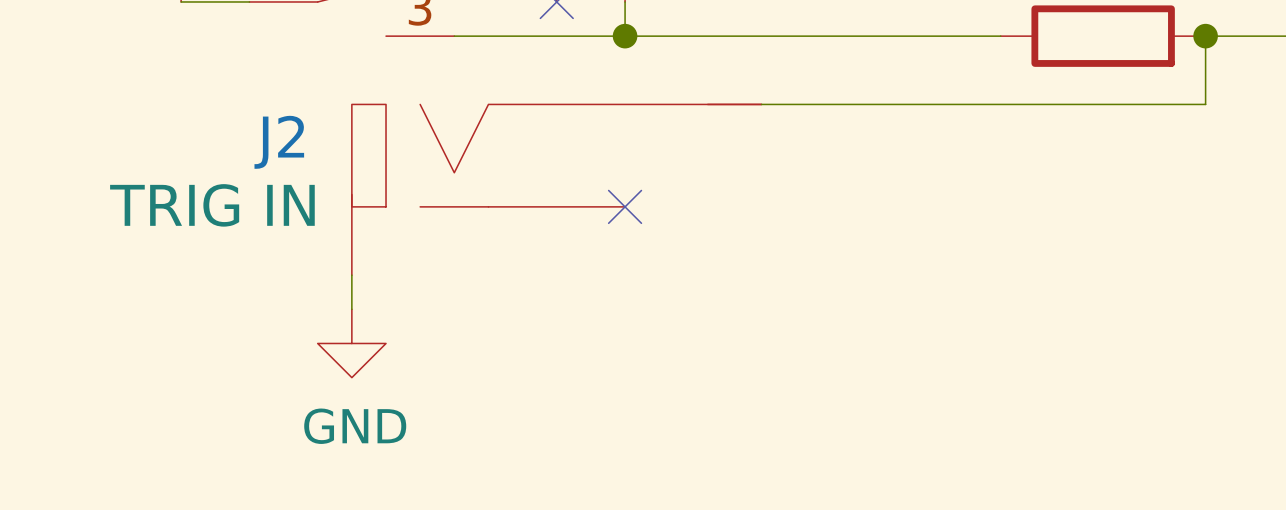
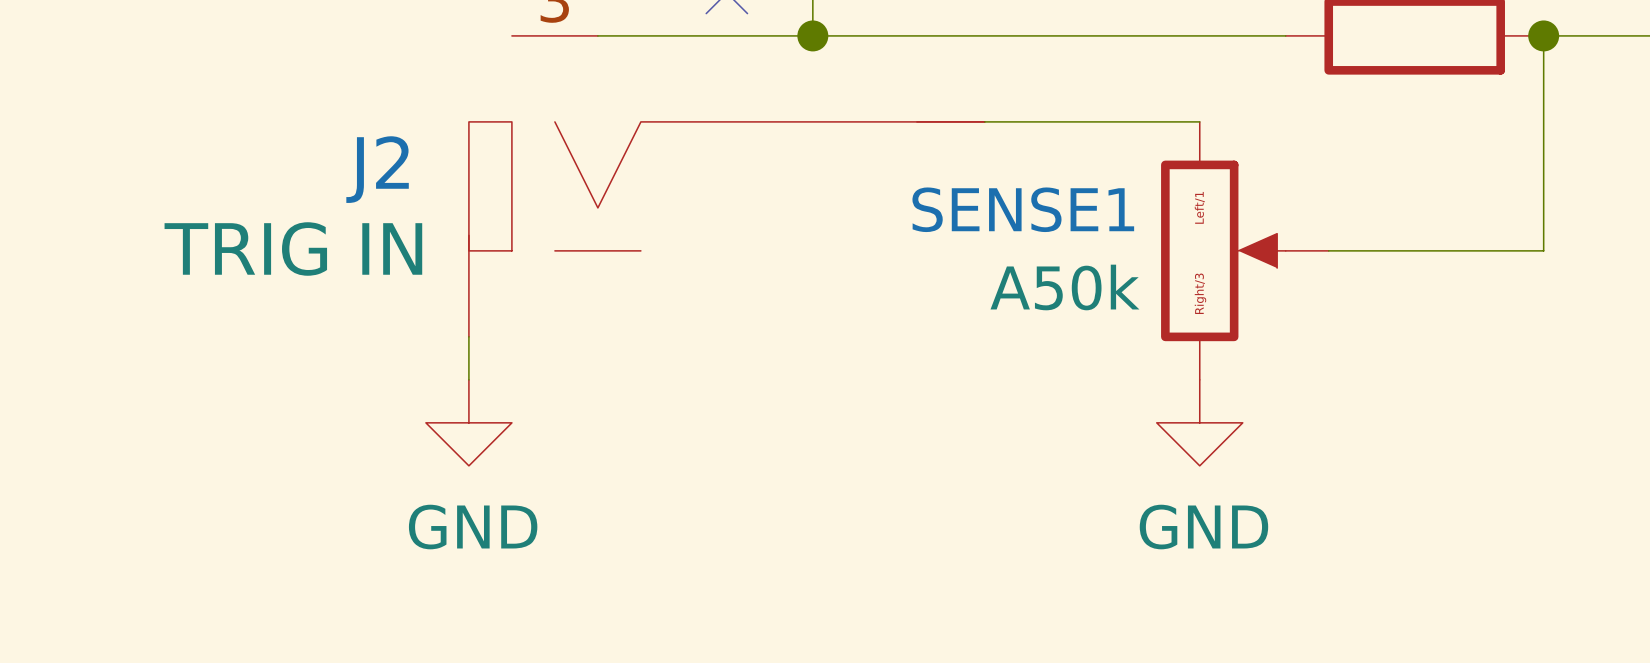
J2 symbol: [351, 104, 762, 276] -> [468, 121, 985, 337]
wire: (932, 104) (1205, 104) -> (1328, 250) (1543, 250) (1543, 121)
no-connect mark: (625, 206) -> none
SENSE1: none -> A50k (1244, 250)
power symbol: none -> GND (1199, 422)

